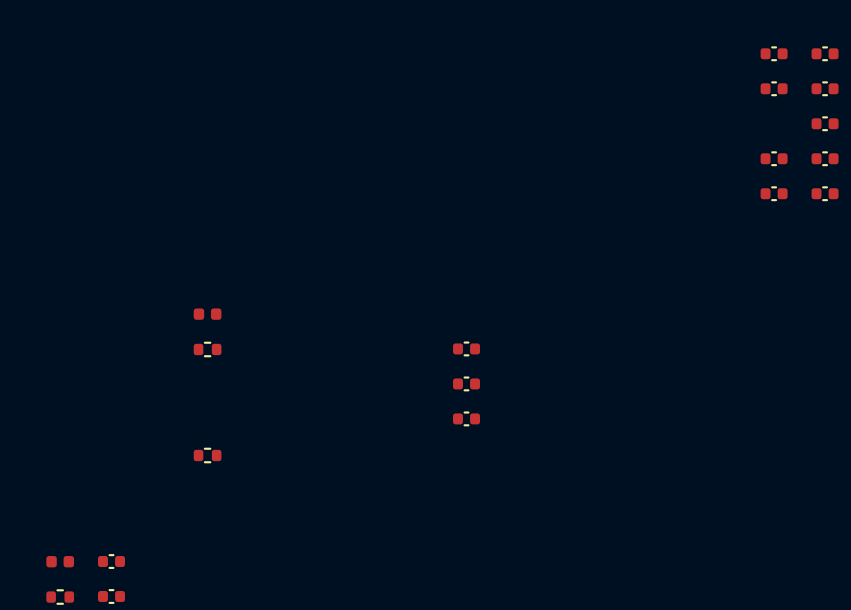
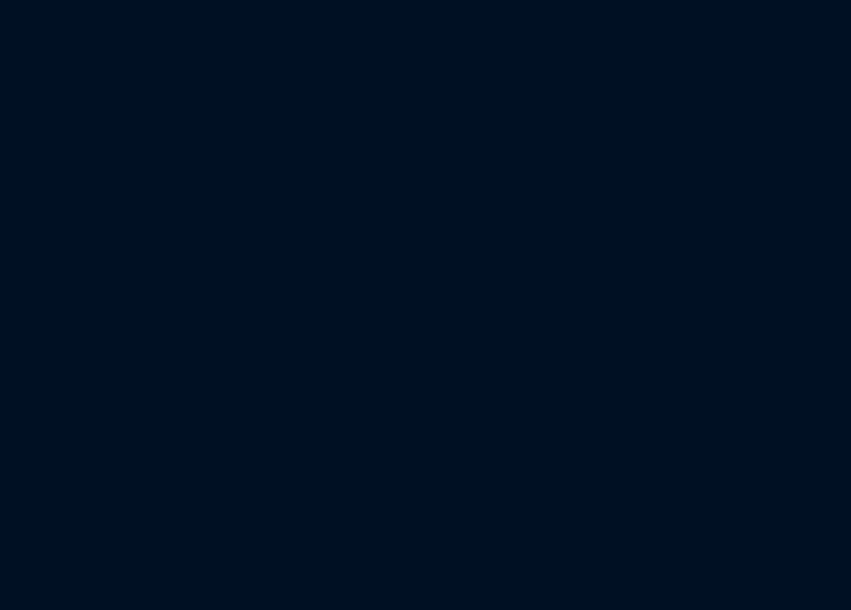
part: (774, 53) -> none
part: (825, 53) -> none
part: (774, 88) -> none
part: (825, 88) -> none
part: (825, 123) -> none
part: (774, 158) -> none
part: (825, 158) -> none
part: (774, 193) -> none
part: (825, 193) -> none
part: (207, 314) -> none
part: (466, 348) -> none
part: (207, 349) -> none
part: (466, 383) -> none
part: (466, 418) -> none
part: (207, 455) -> none
part: (60, 561) -> none
part: (111, 561) -> none
part: (111, 596) -> none
part: (60, 597) -> none

